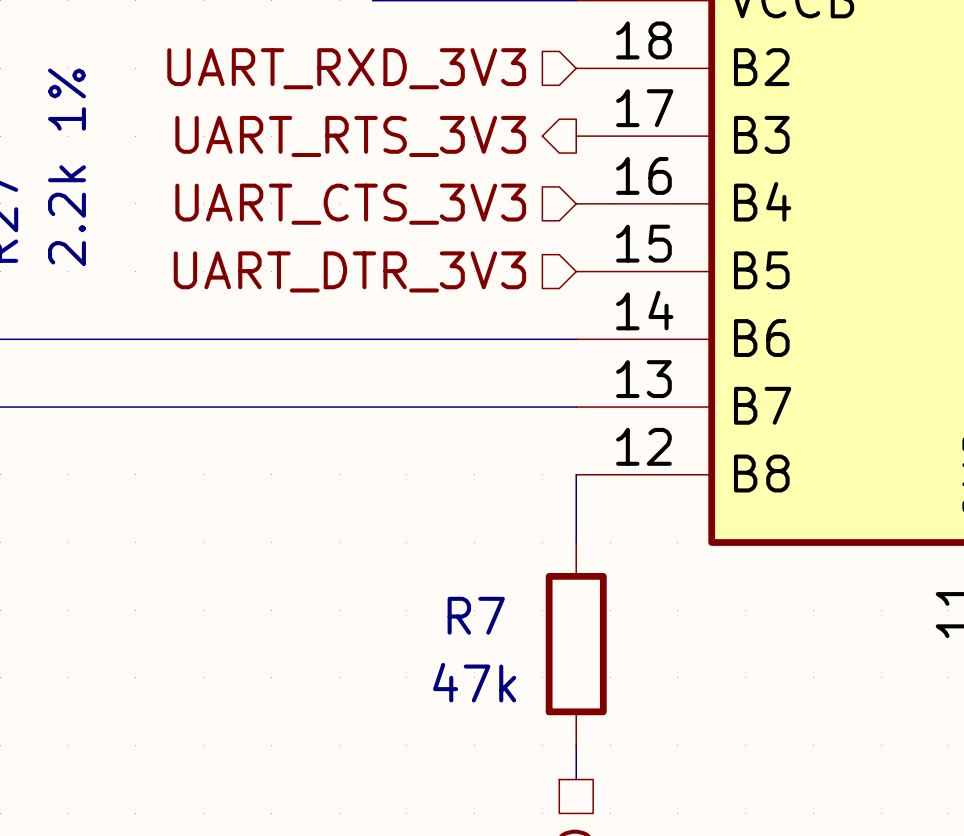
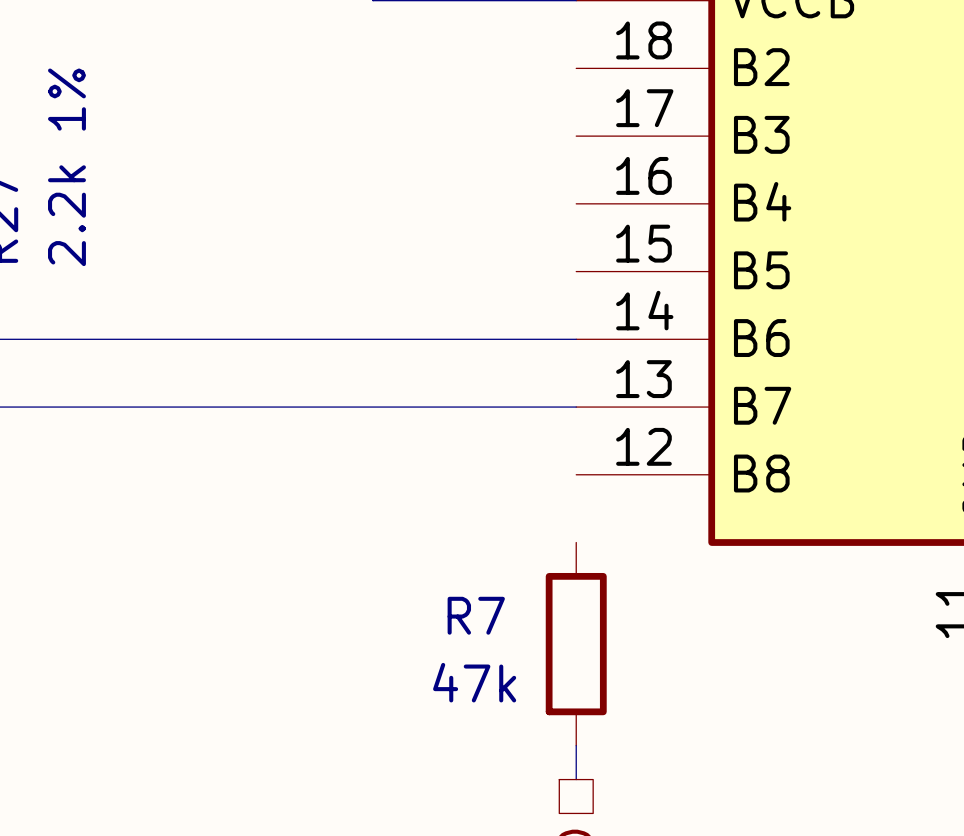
hierarchical label: UART_RXD_3V3 (346, 68) -> none
hierarchical label: UART_RTS_3V3 (350, 136) -> none
hierarchical label: UART_CTS_3V3 (350, 204) -> none
hierarchical label: UART_DTR_3V3 (349, 271) -> none
wire: (576, 474) (576, 542) -> none

